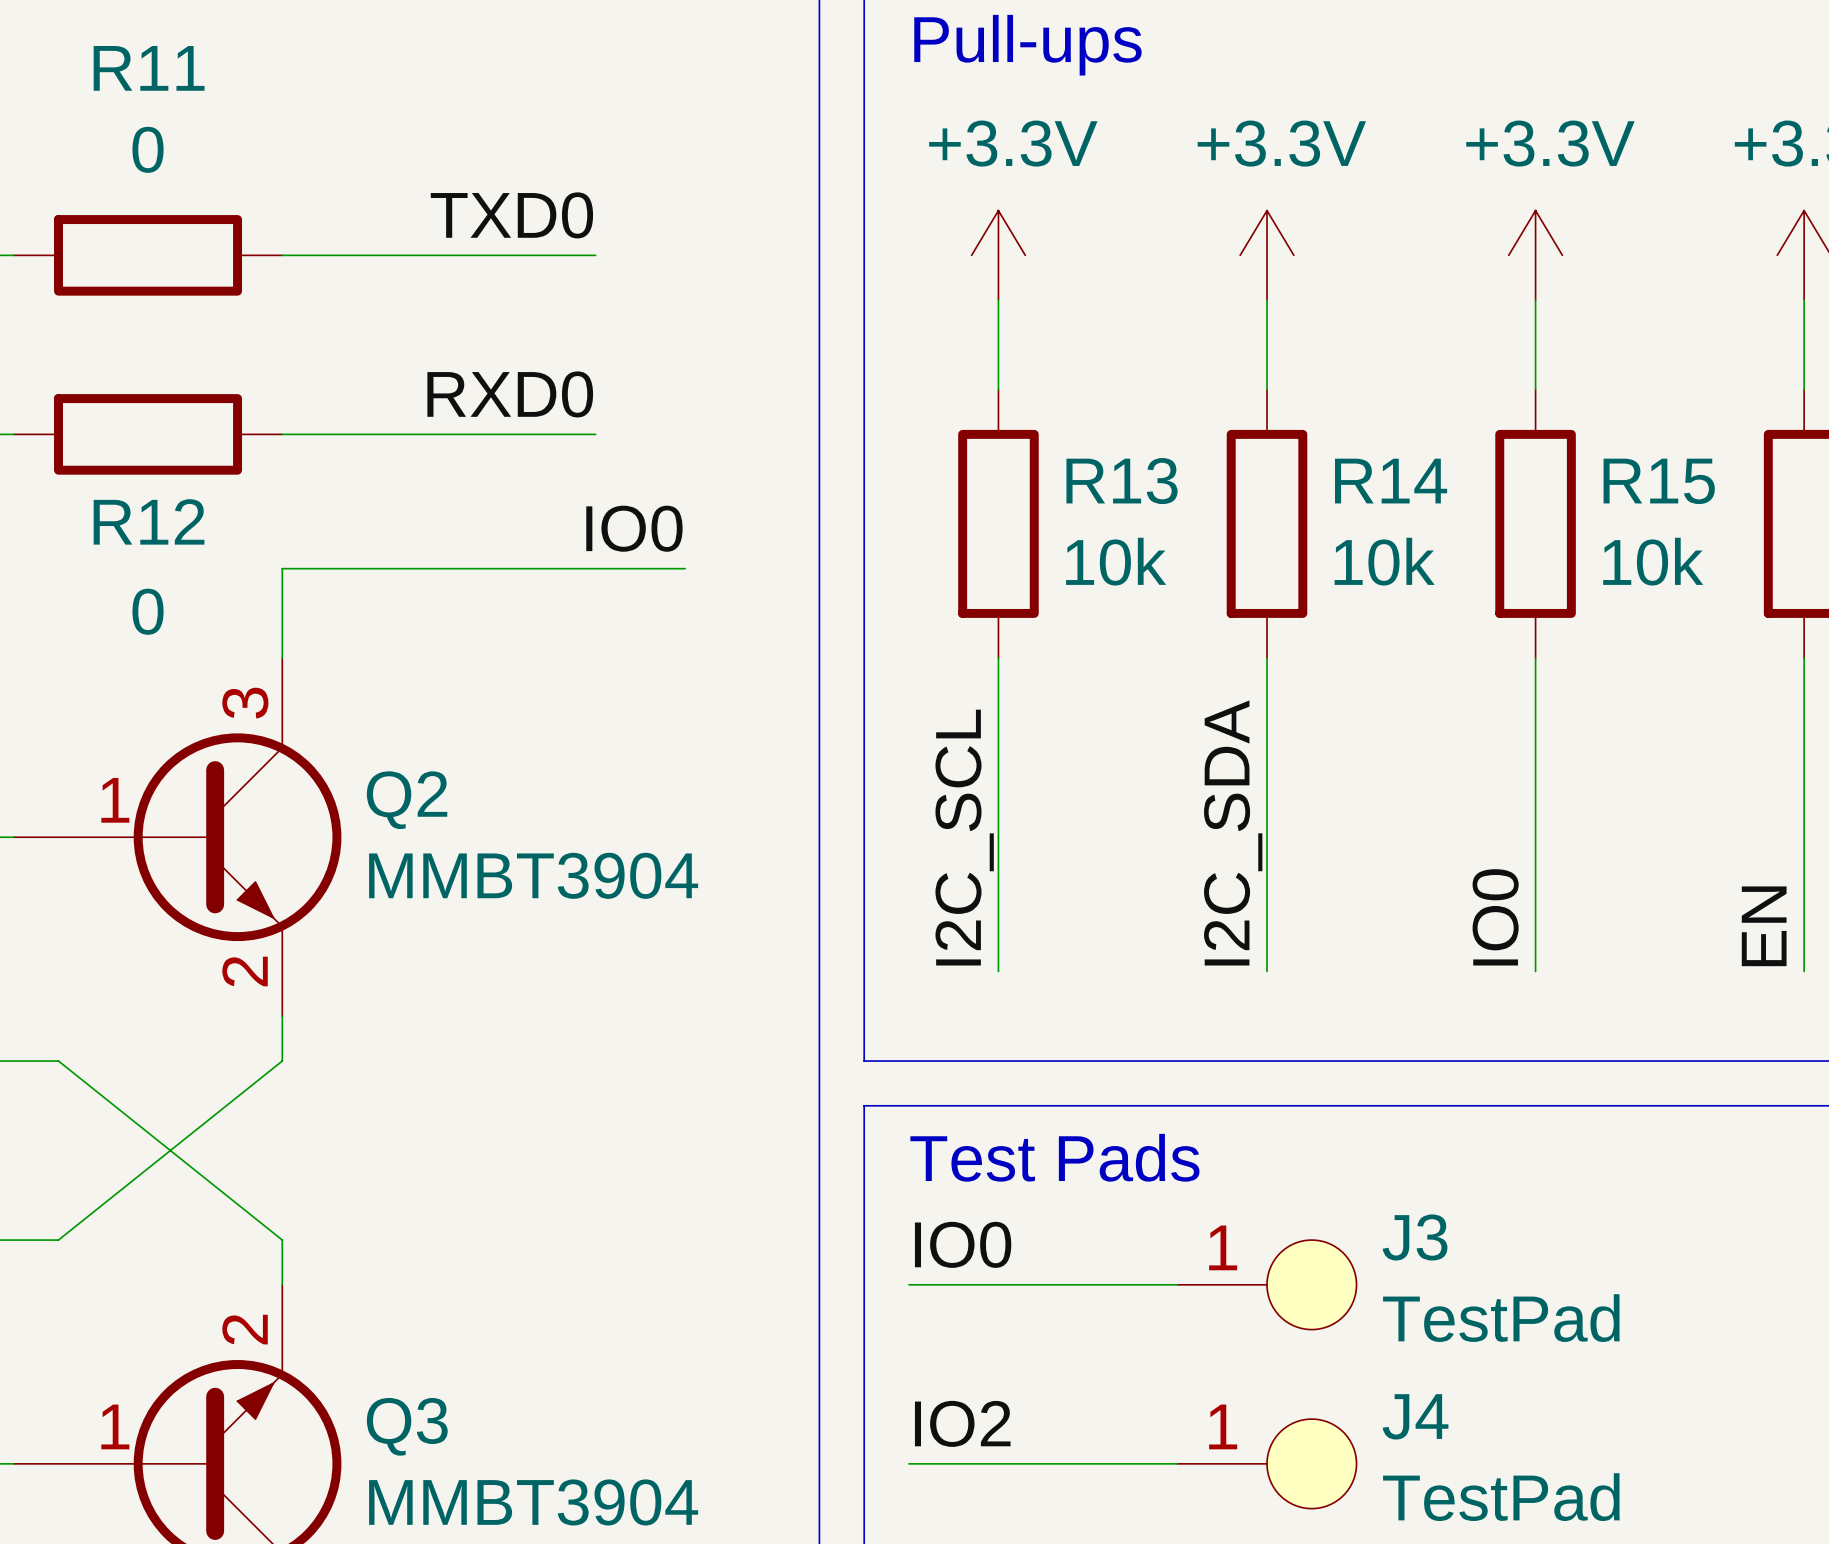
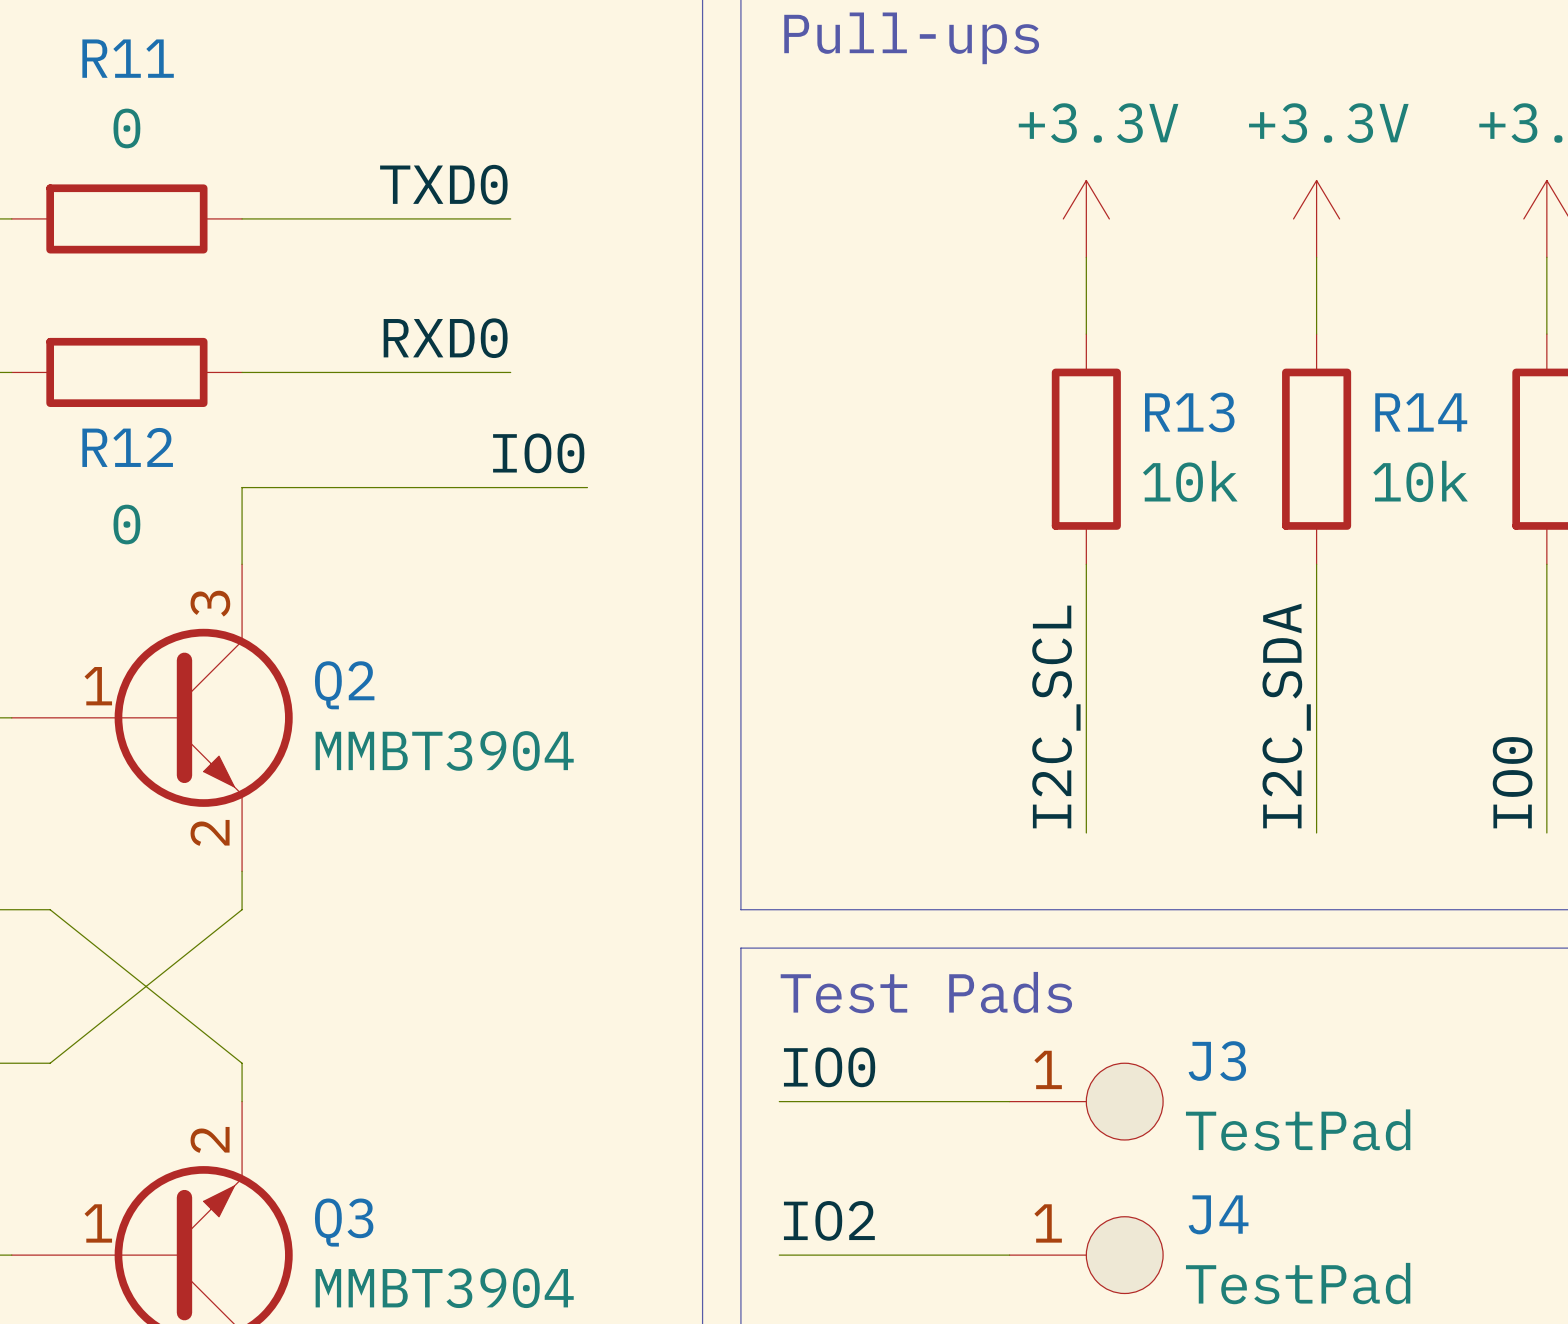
power symbol: +3.3V (998, 255) -> none
wire: (998, 300) (998, 389) -> none
R14 name: R14 (1391, 481) -> R13 (1189, 412)
R15 name: R15 (1659, 481) -> R14 (1421, 412)
R13: 10k (998, 523) -> none
wire: (998, 658) (998, 971) -> none
label: I2C_SDA (1233, 832) -> I2C_SCL (1056, 716)
label: I2C_SCL (964, 837) -> none
label: IO0 (1495, 917) -> I2C_SDA (1286, 716)
label: EN (1764, 926) -> IO0 (1512, 782)

